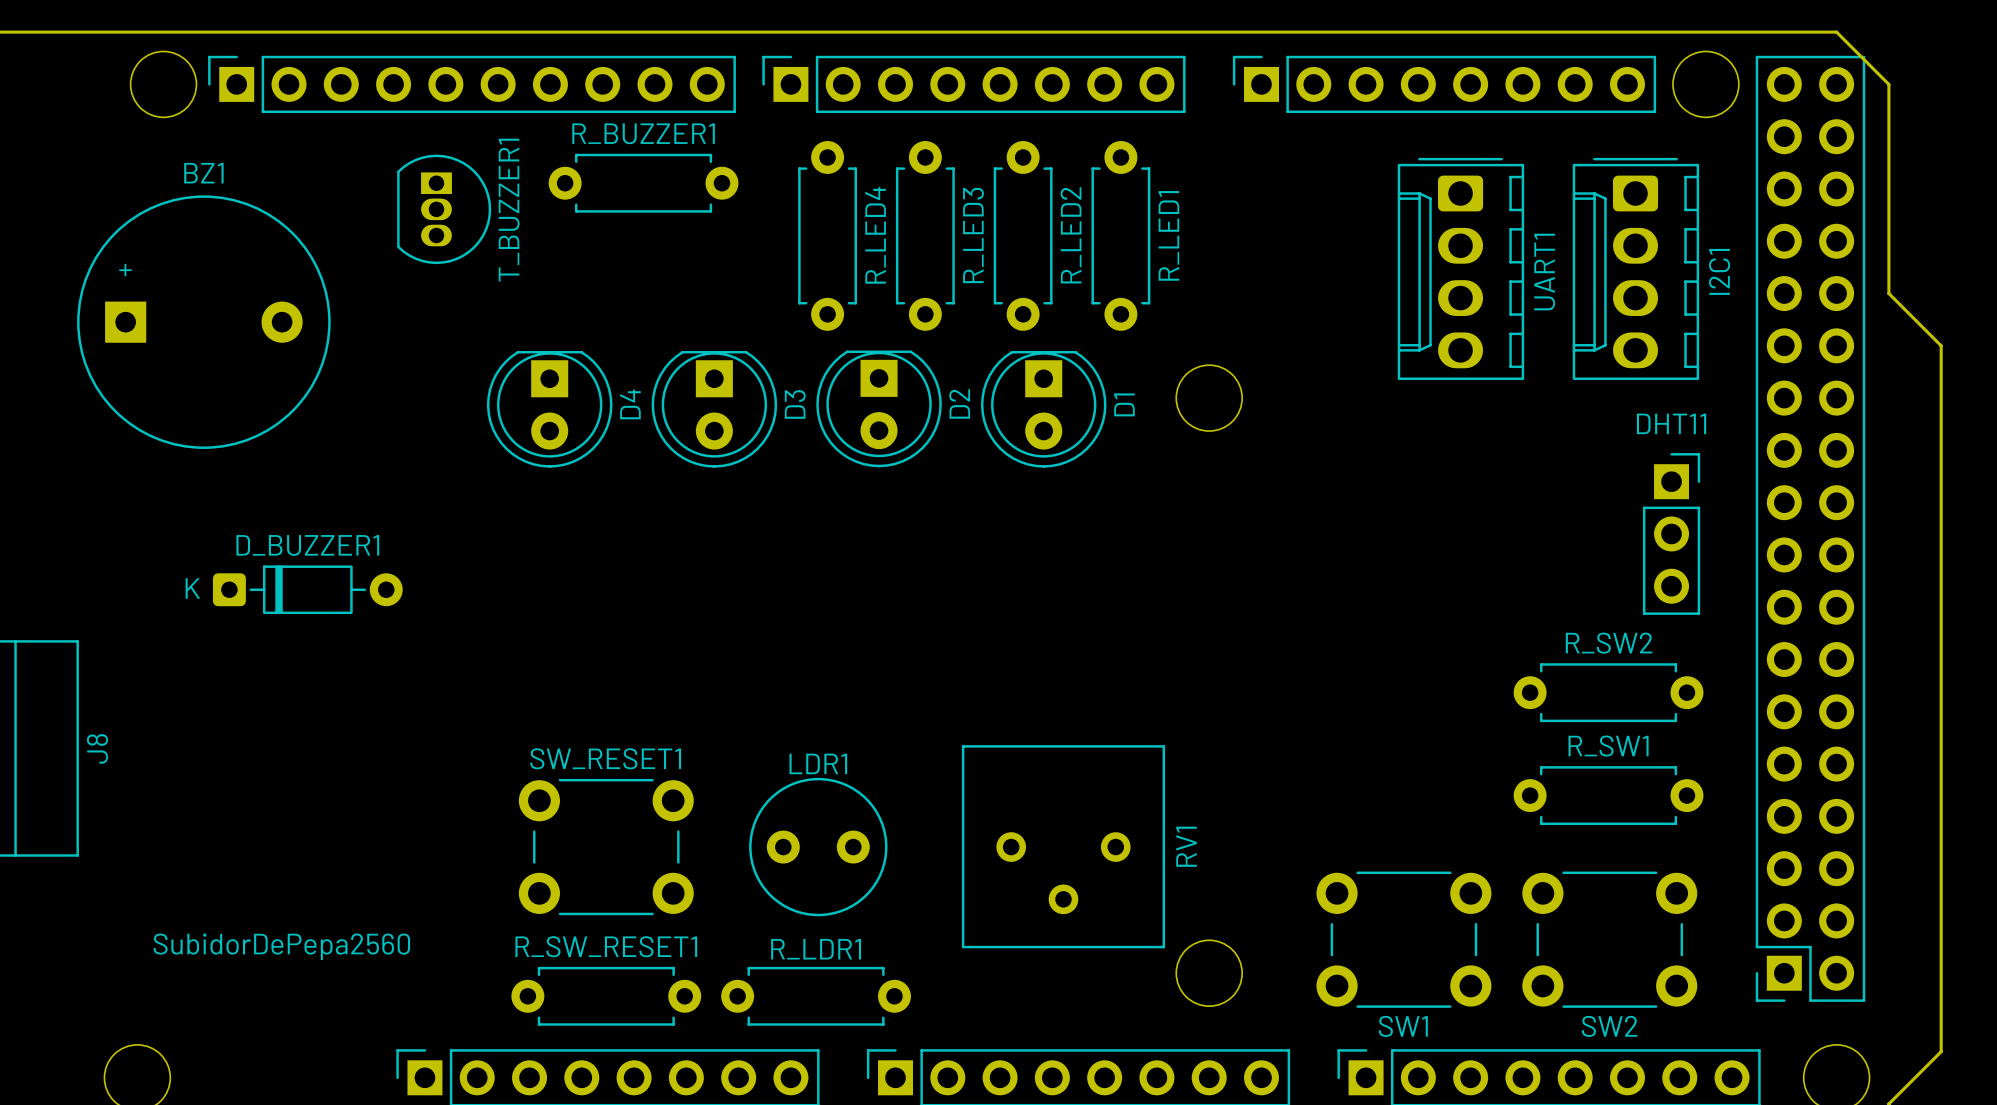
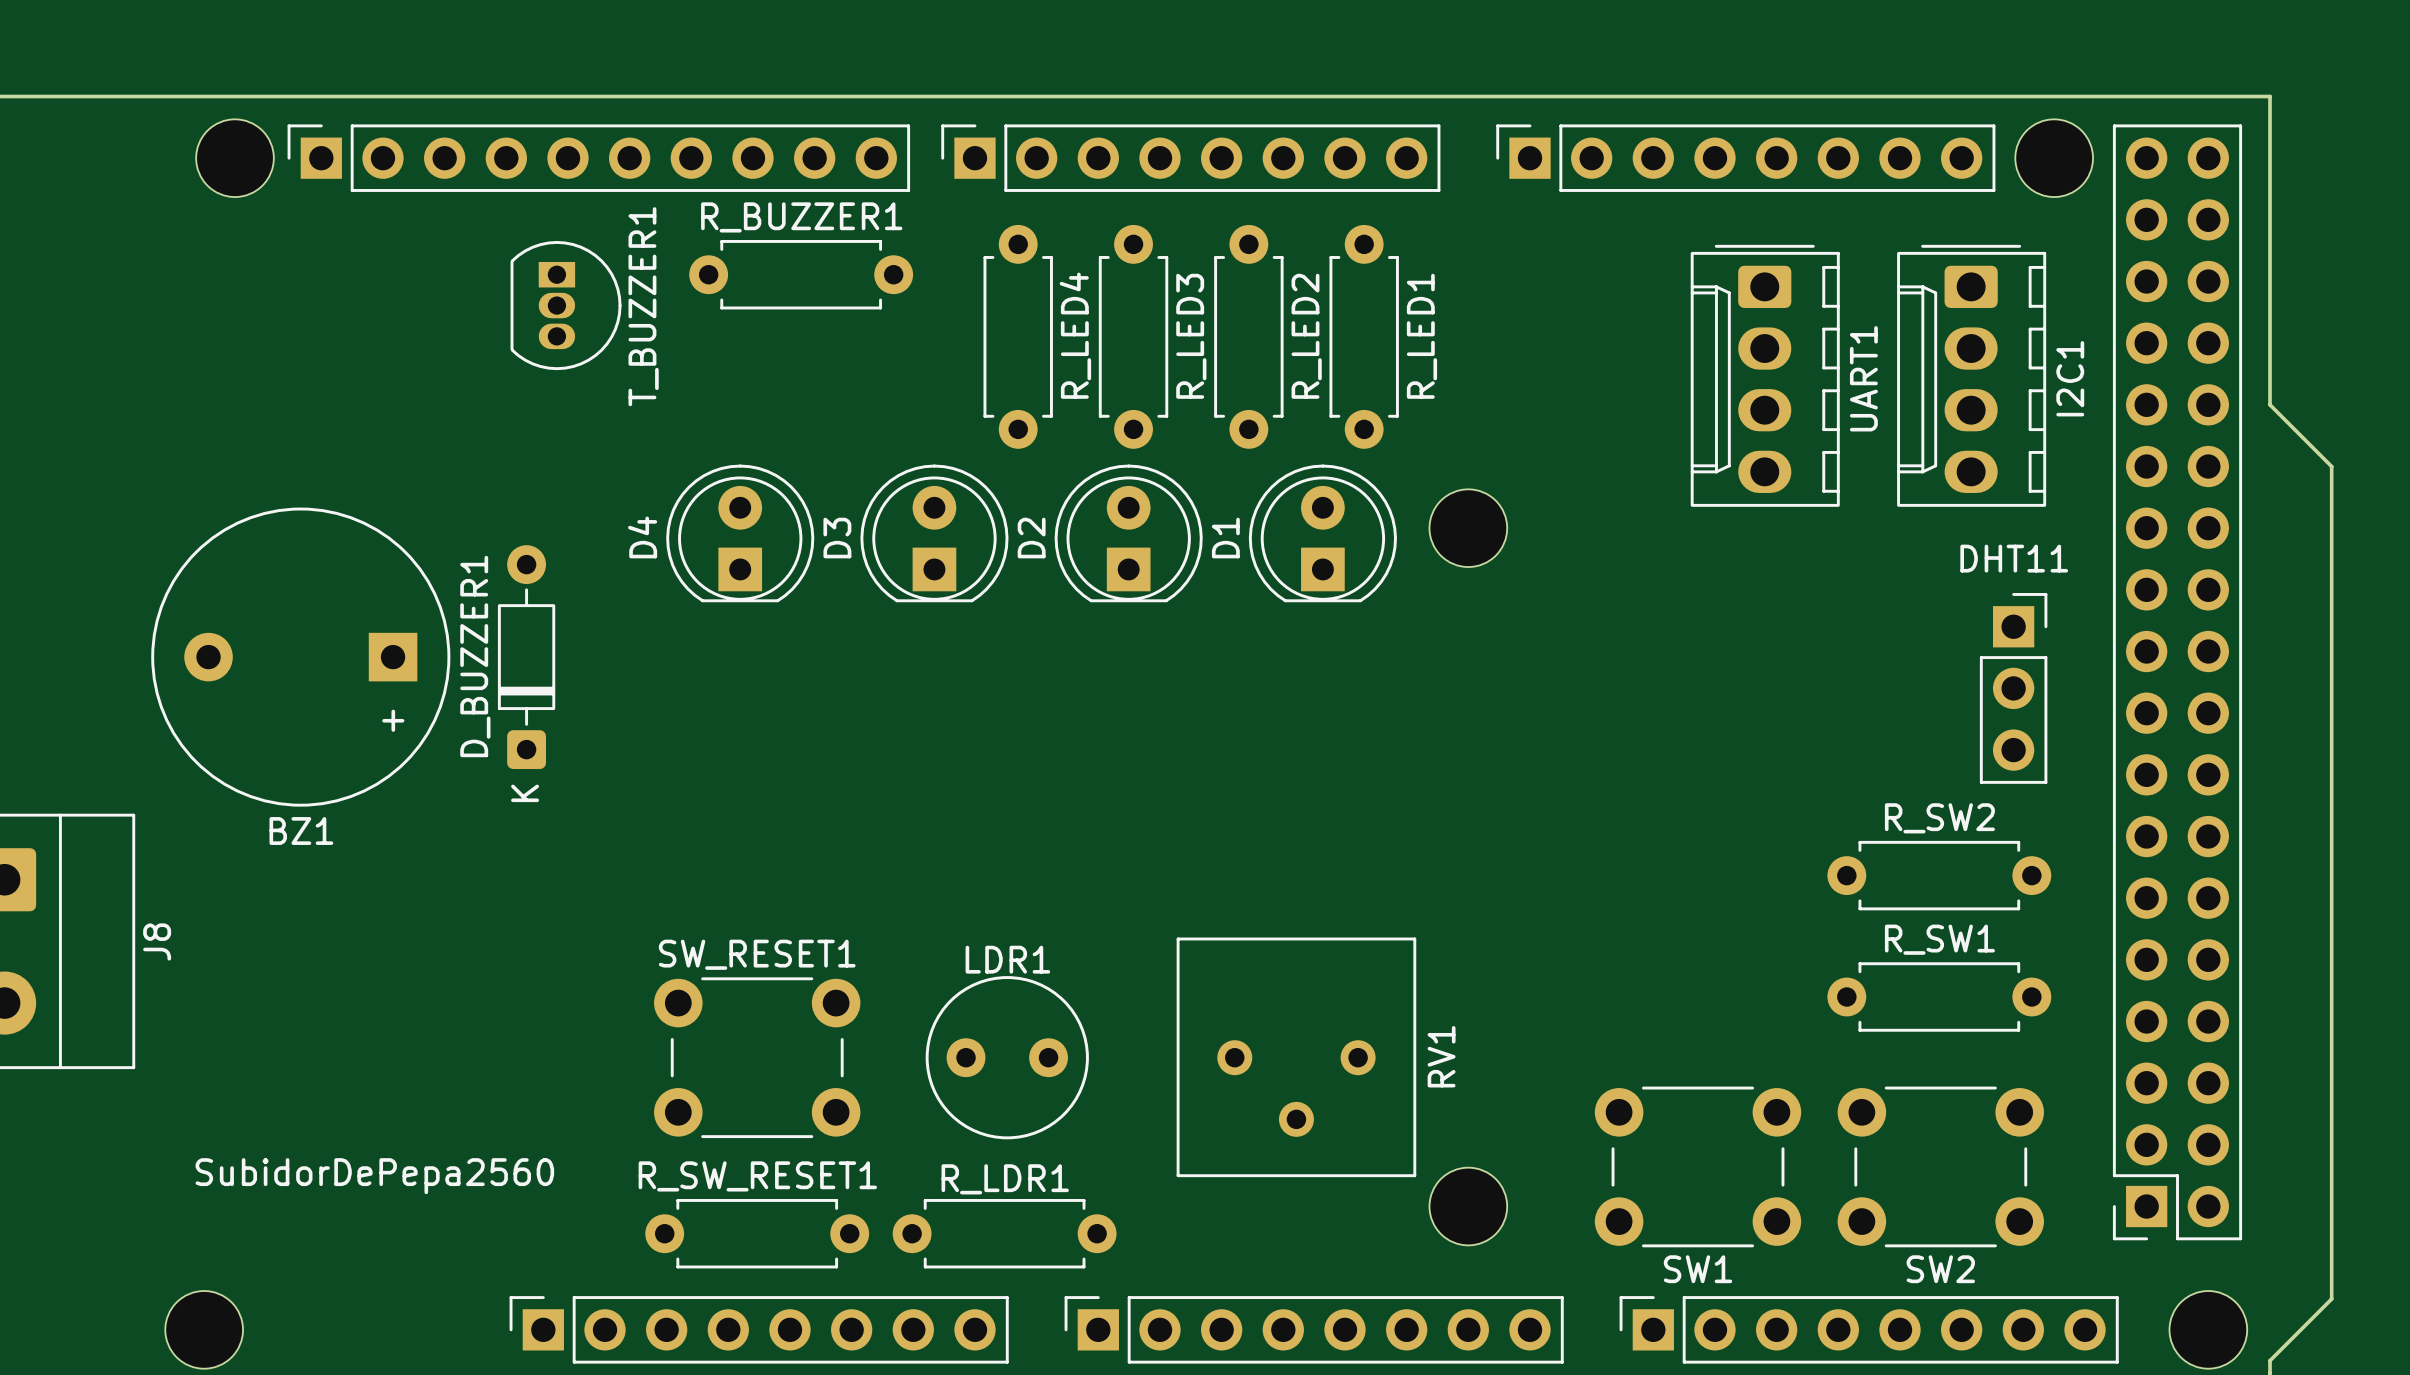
board edge: (1836, 32) (1888, 84) -> (2208, 96) (2270, 96) (2270, 158)
BZ1 rotation: 0° (203, 322) -> 180° (300, 657)
BZ1 position: (203, 322) -> (300, 657)
D2 rotation: 0° (879, 408) -> 180° (1128, 533)
D4 rotation: 0° (549, 409) -> 180° (740, 533)
D3 rotation: 0° (714, 409) -> 180° (934, 533)
D1 rotation: 0° (1043, 409) -> 180° (1322, 533)
D_BUZZER1 rotation: 0° (307, 589) -> 90° counterclockwise (526, 657)
D_BUZZER1 position: (307, 589) -> (526, 657)

